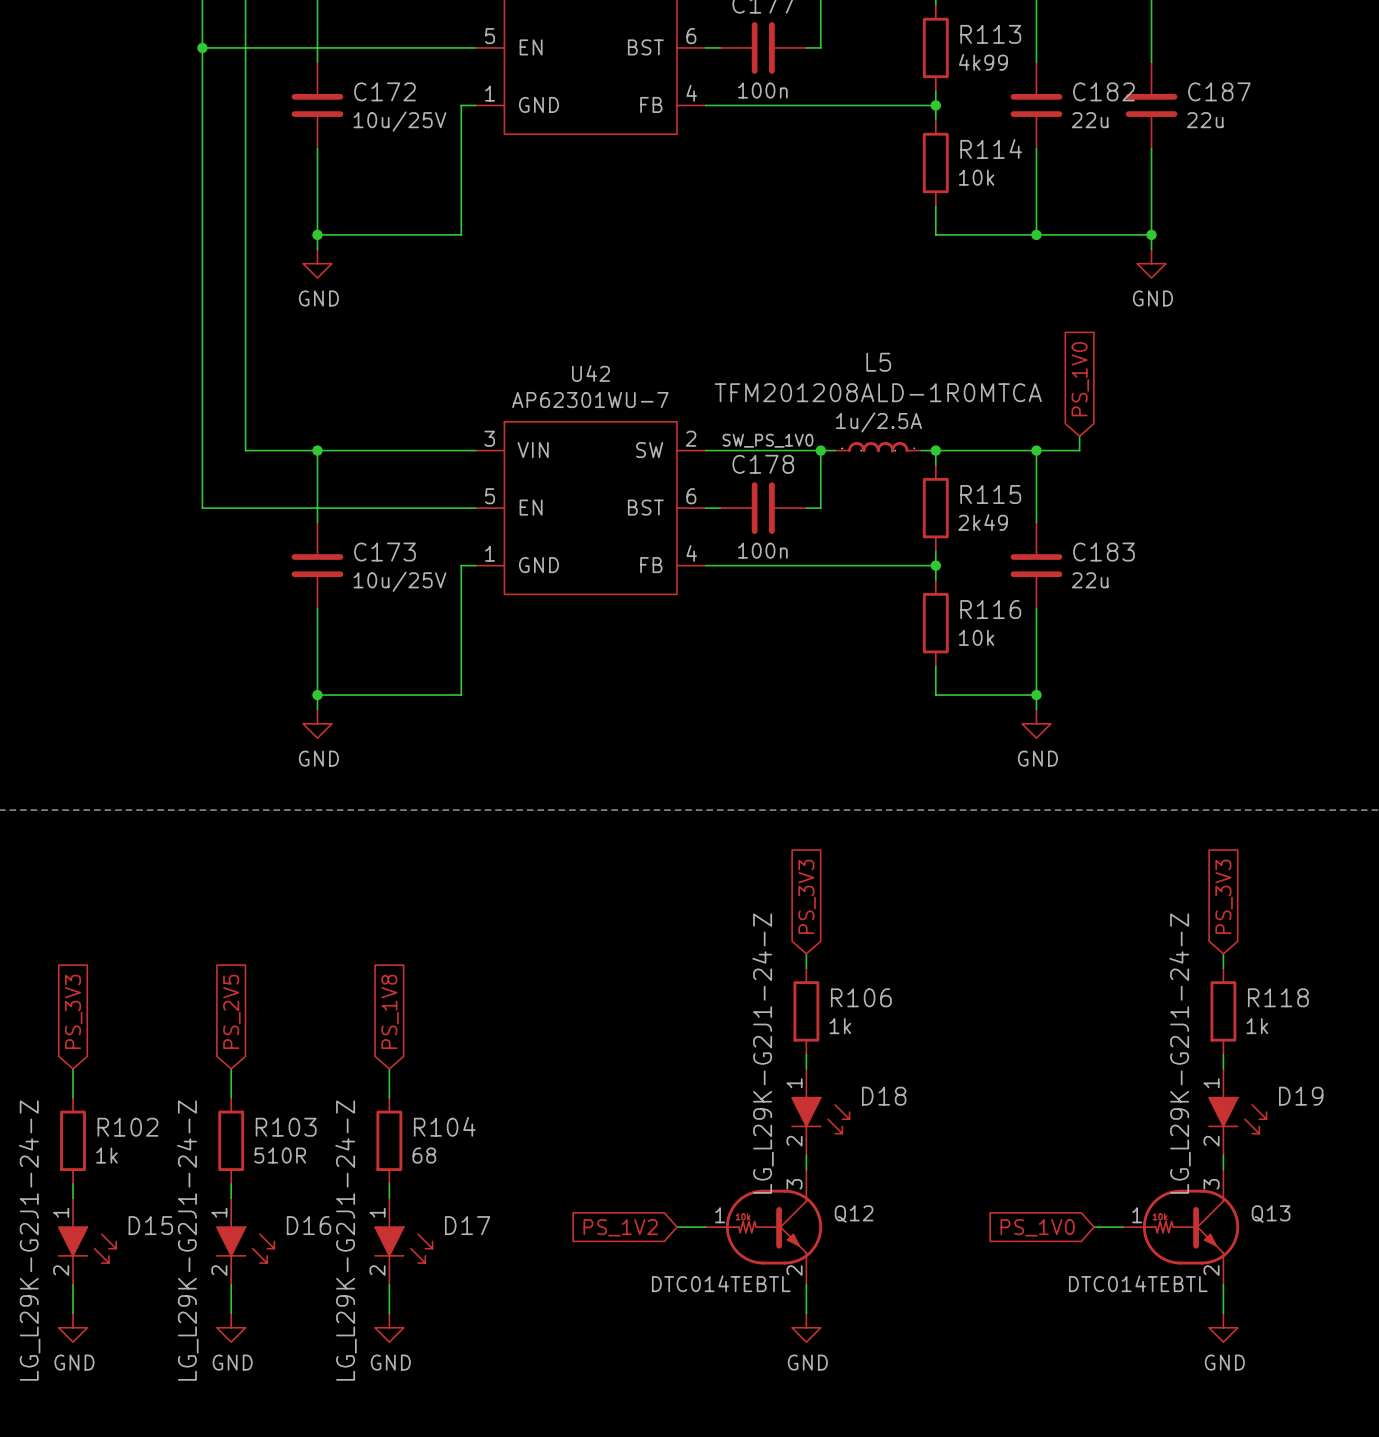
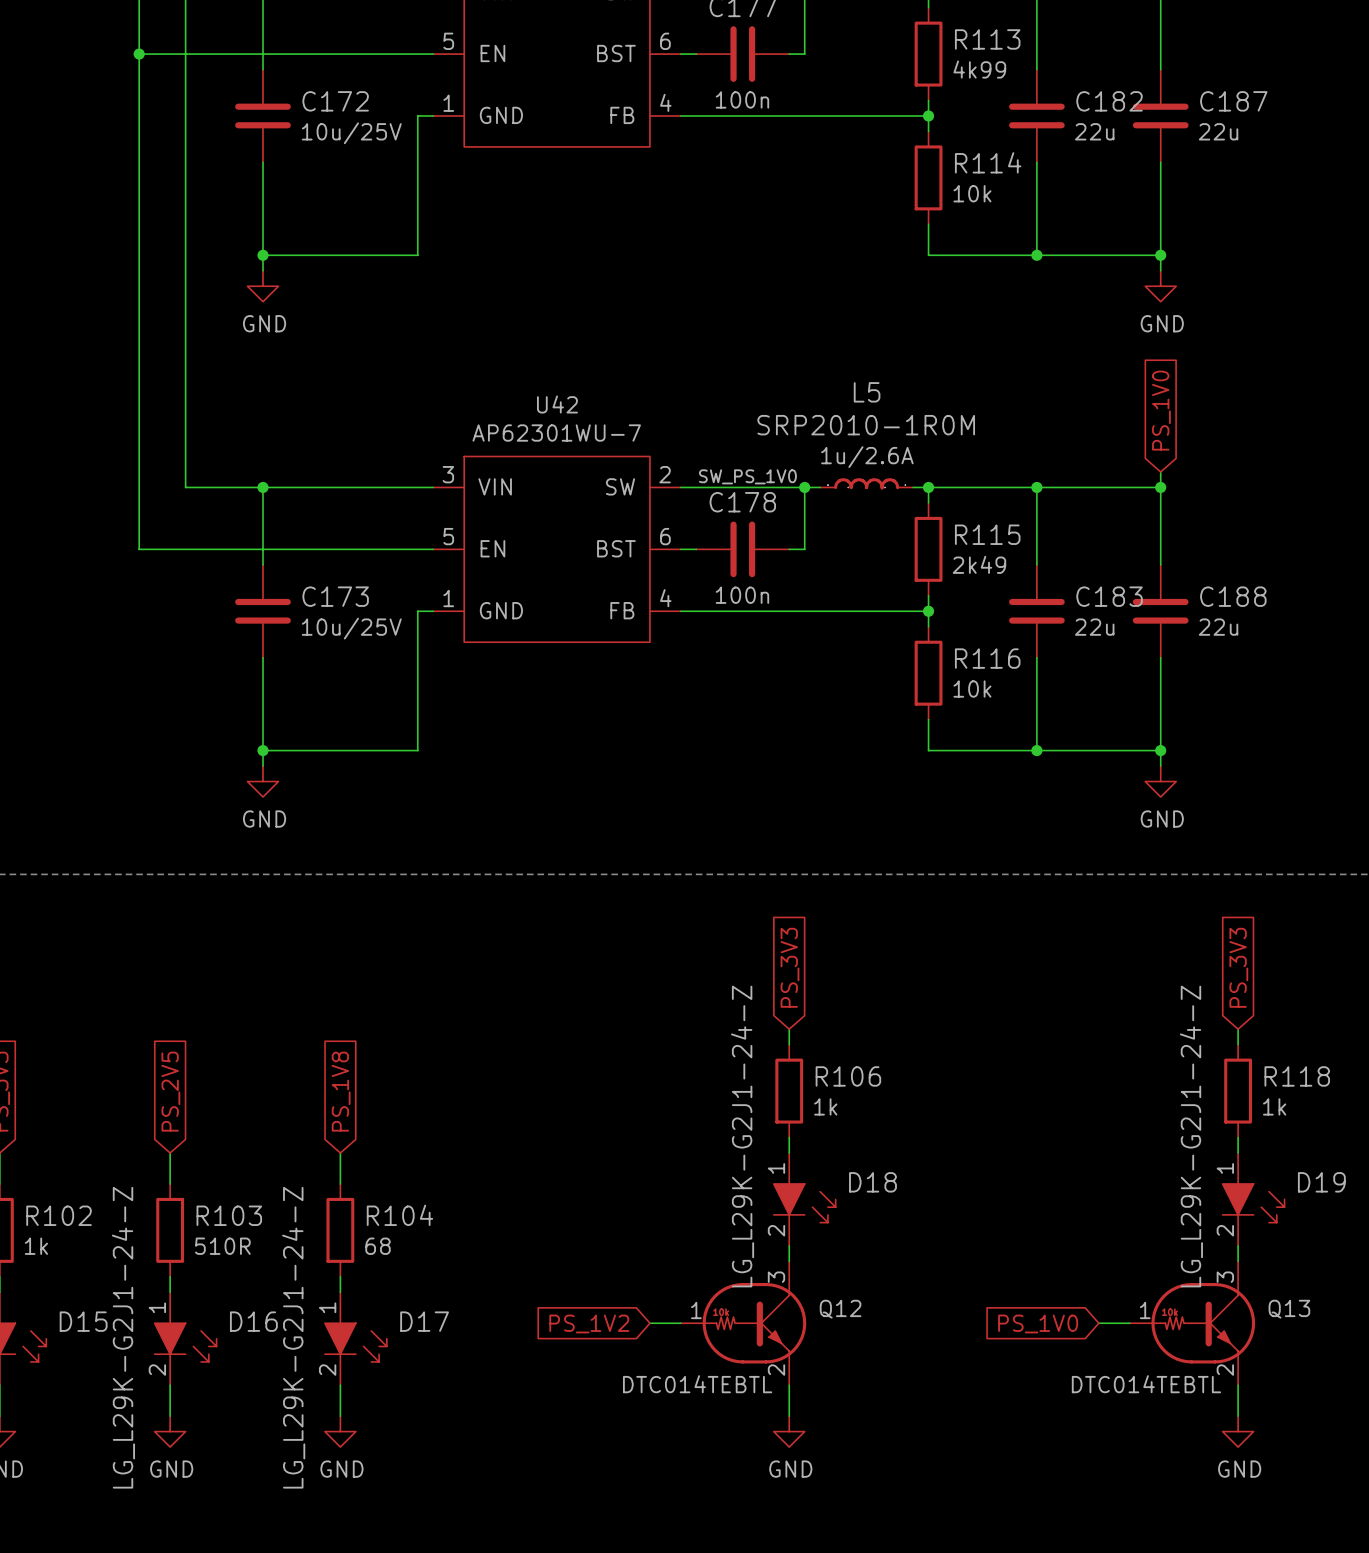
global label position: PS_1V0 (1080, 379) -> PS_1V0 (1161, 410)
L5 value: TFM201208ALD-1R0MTCA (878, 392) -> SRP2010-1R0M (866, 425)
L5 text: 1u/2.5A (878, 422) -> 1u/2.6A (867, 457)
wire: (1079, 436) (1079, 450) -> (1160, 487) (1083, 487)
wire: none -> (1160, 471) (1160, 564)
junction: none -> (1160, 487)
C188: none -> (1160, 611)
wire: none -> (1160, 657) (1160, 766)
wire: (1036, 695) (1036, 709) -> (1036, 750) (1160, 750)
junction: none -> (1160, 750)
power symbol position: GND (1036, 723) -> GND (1160, 781)

